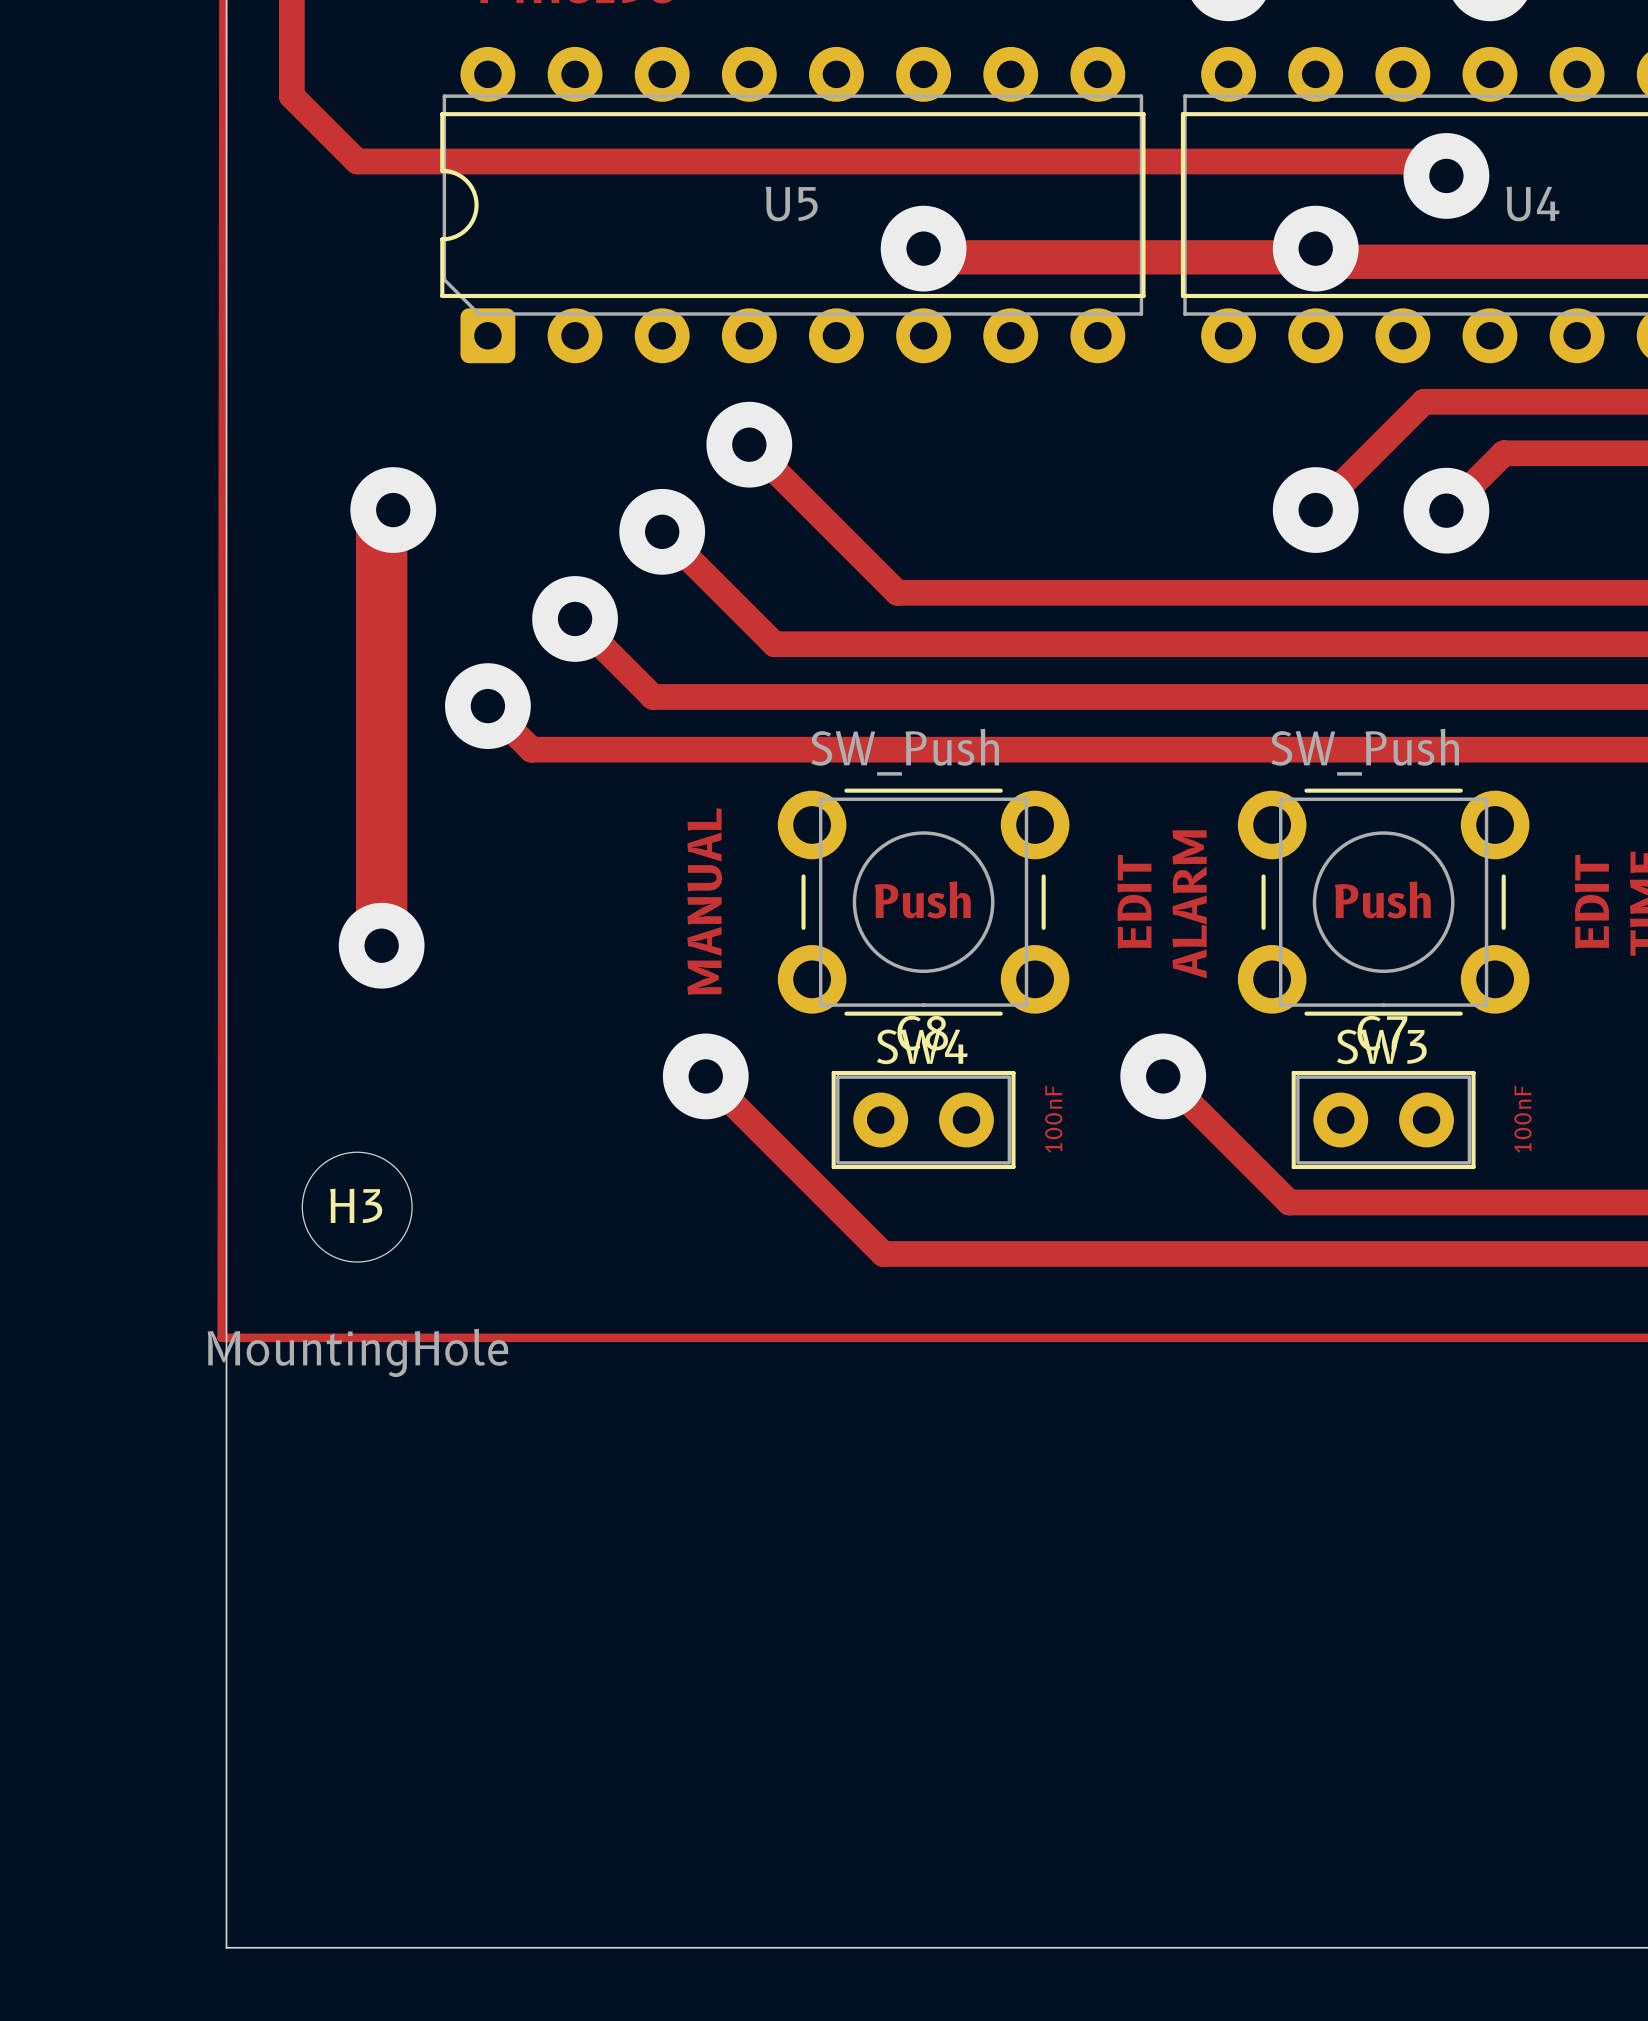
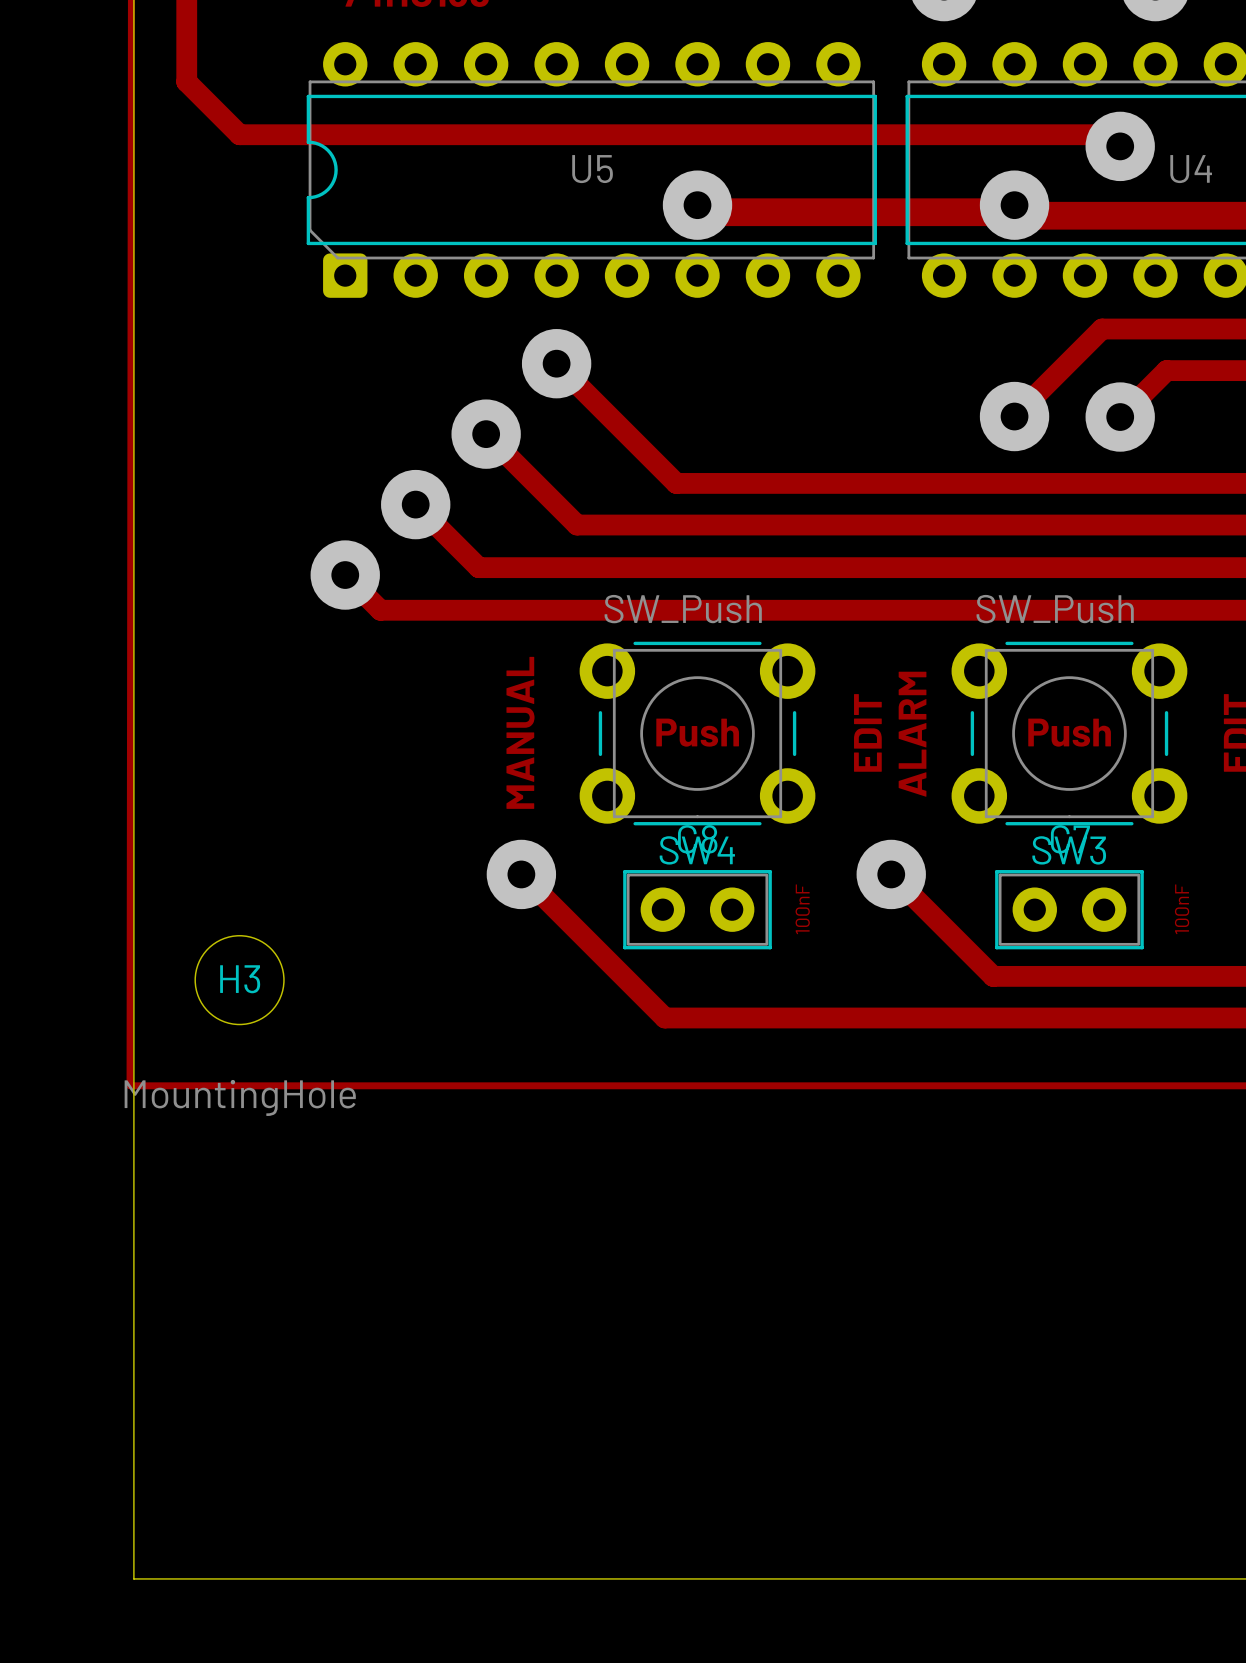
track: (393, 510) (381, 521) (381, 945) -> none
via: (393, 510) -> none
via: (381, 945) -> none

